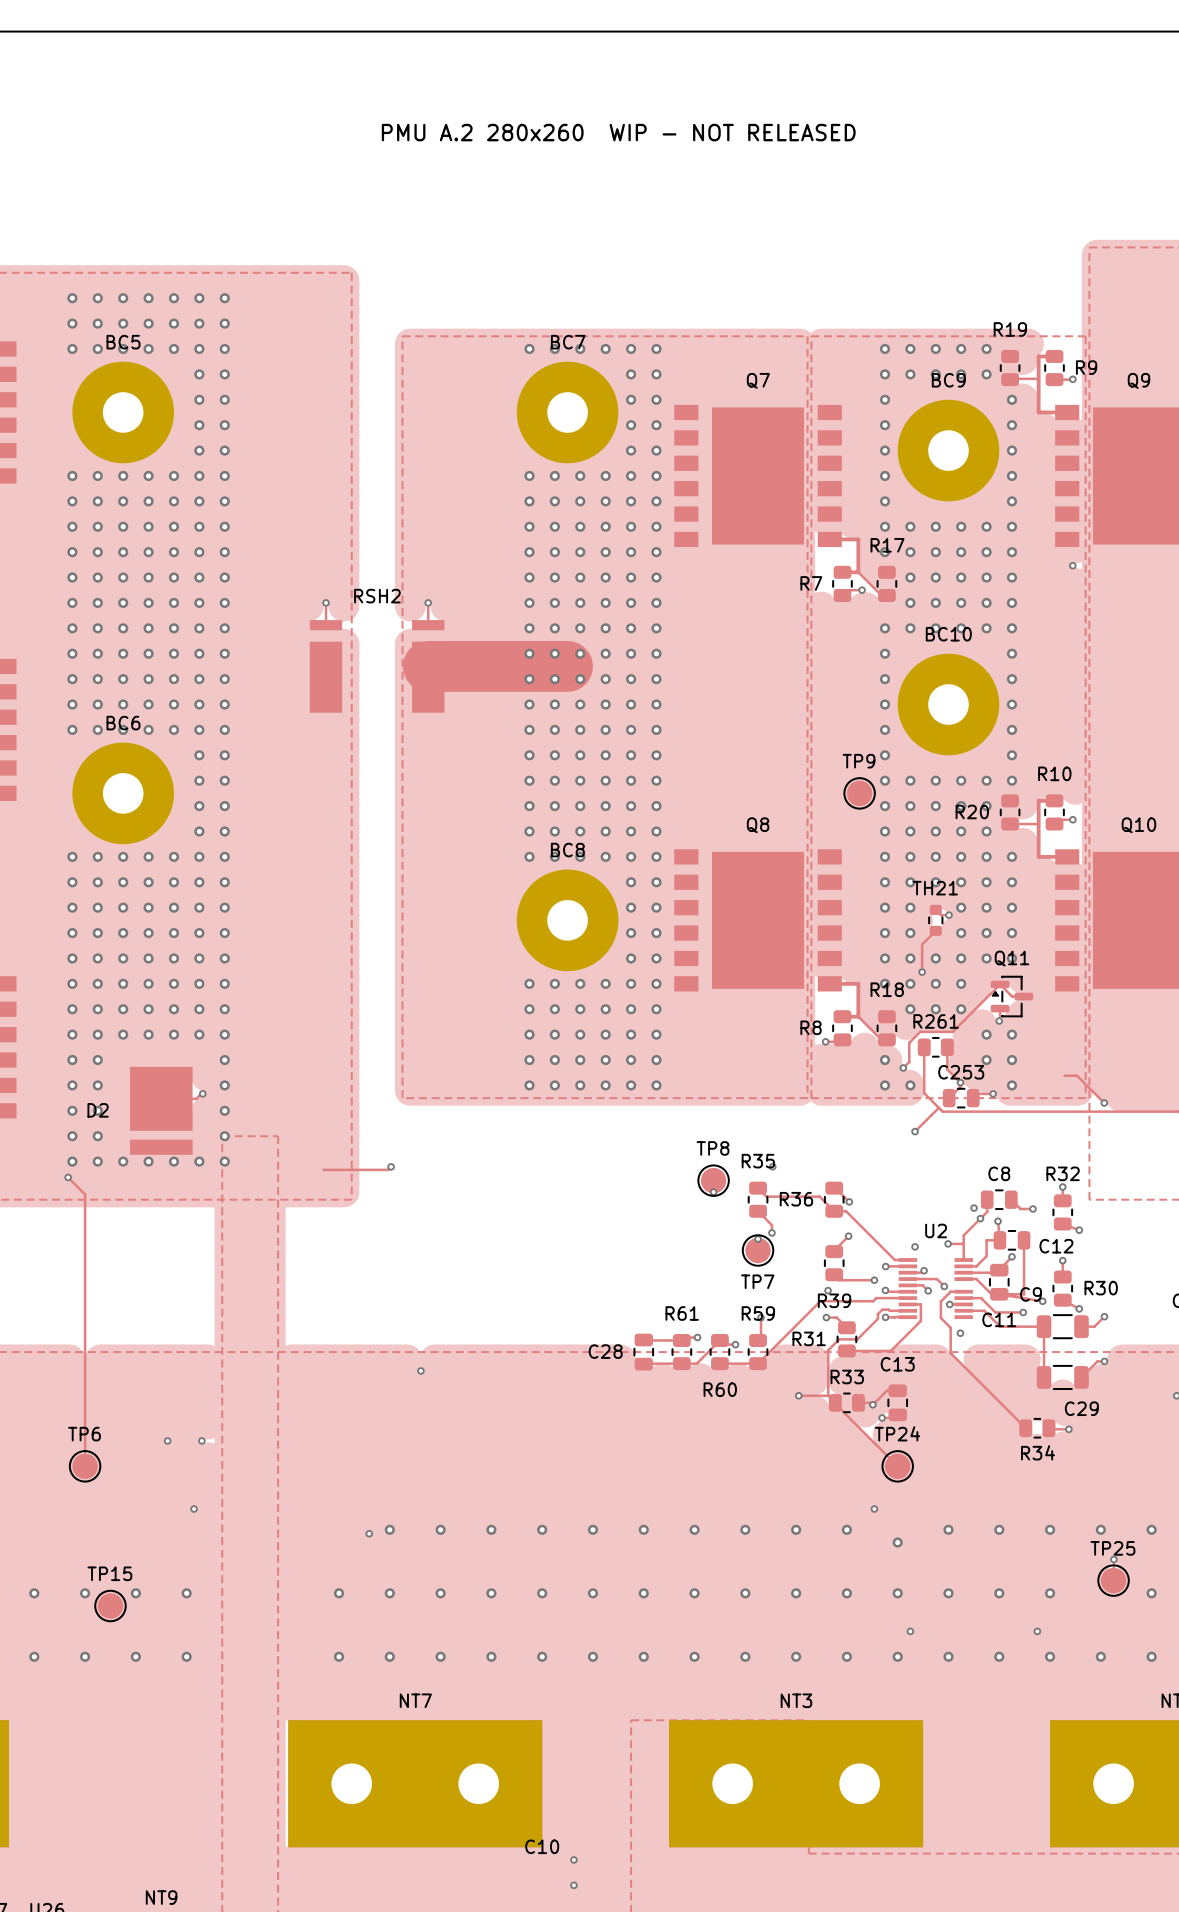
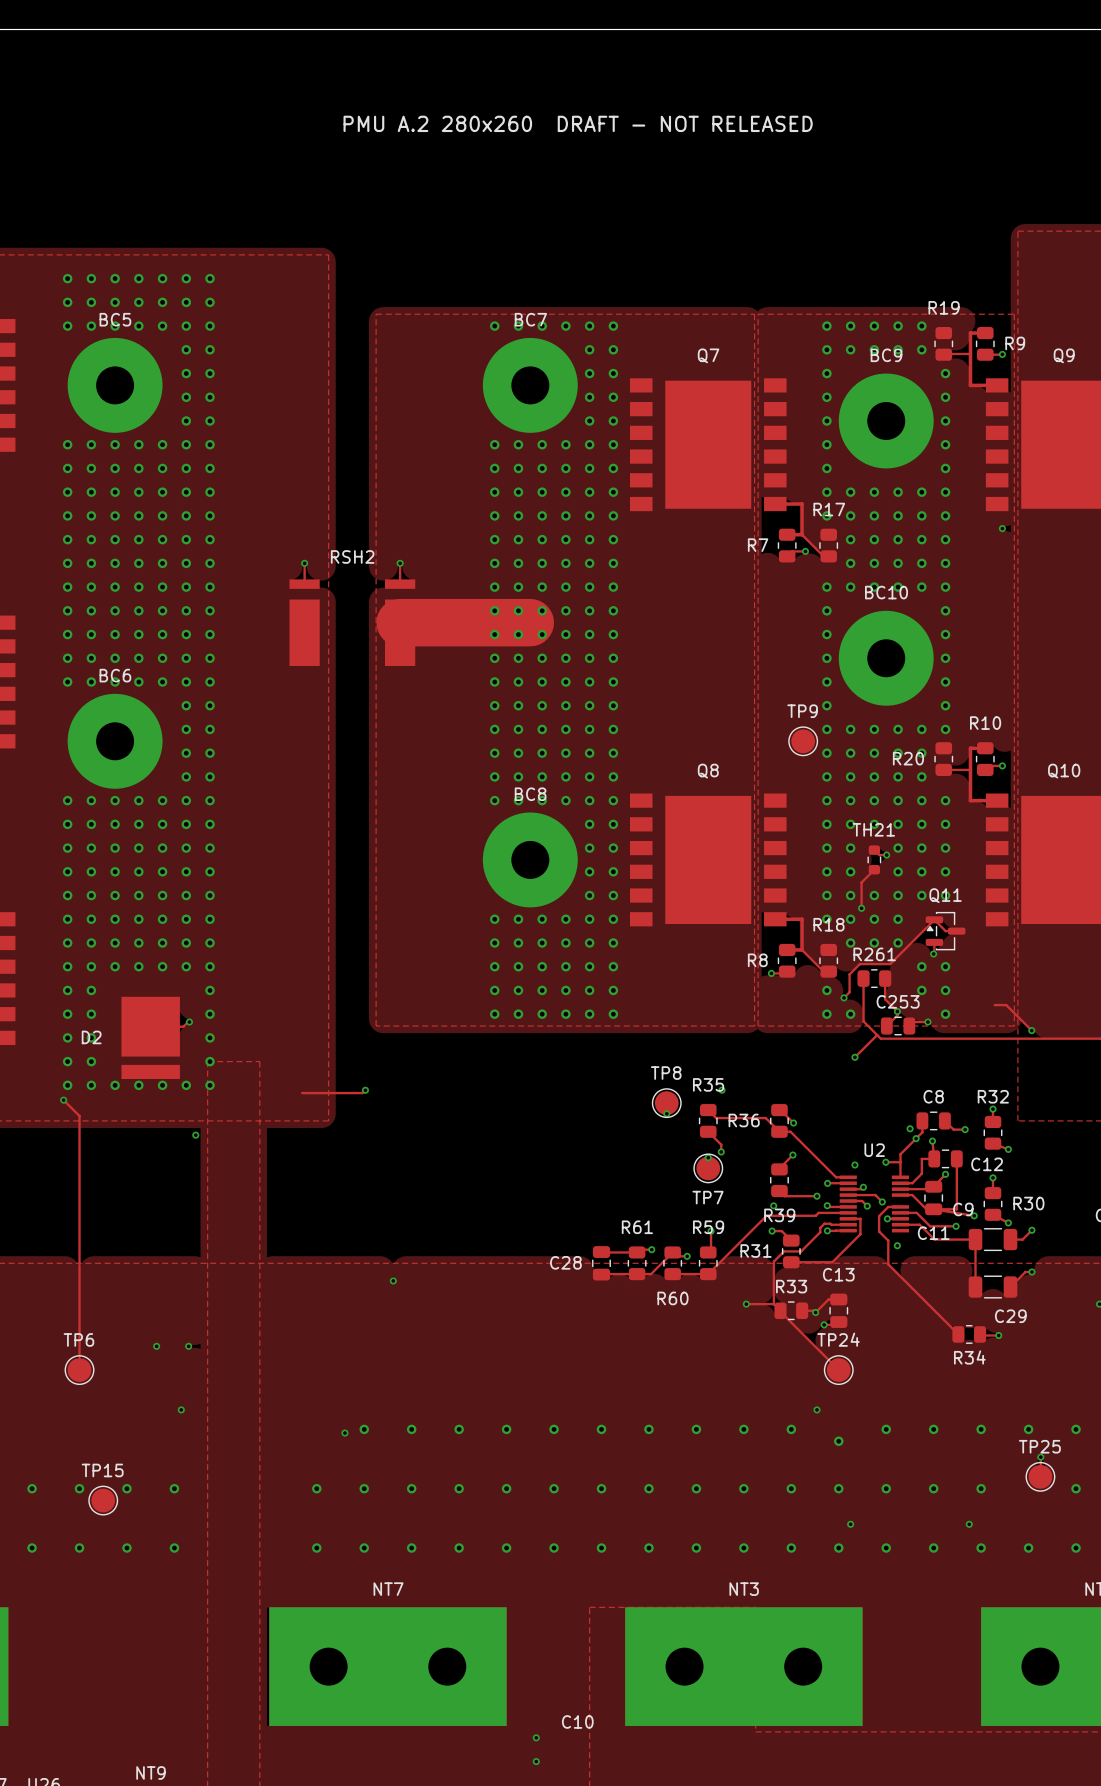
text: PMU A.2 280x260 WIP - NOT RELEASED (618, 132) -> PMU A.2 280x260 DRAFT - NOT RELEASED (578, 123)
via: none -> (195, 1135)
C10 name position: C10 (542, 1846) -> C10 (577, 1721)

